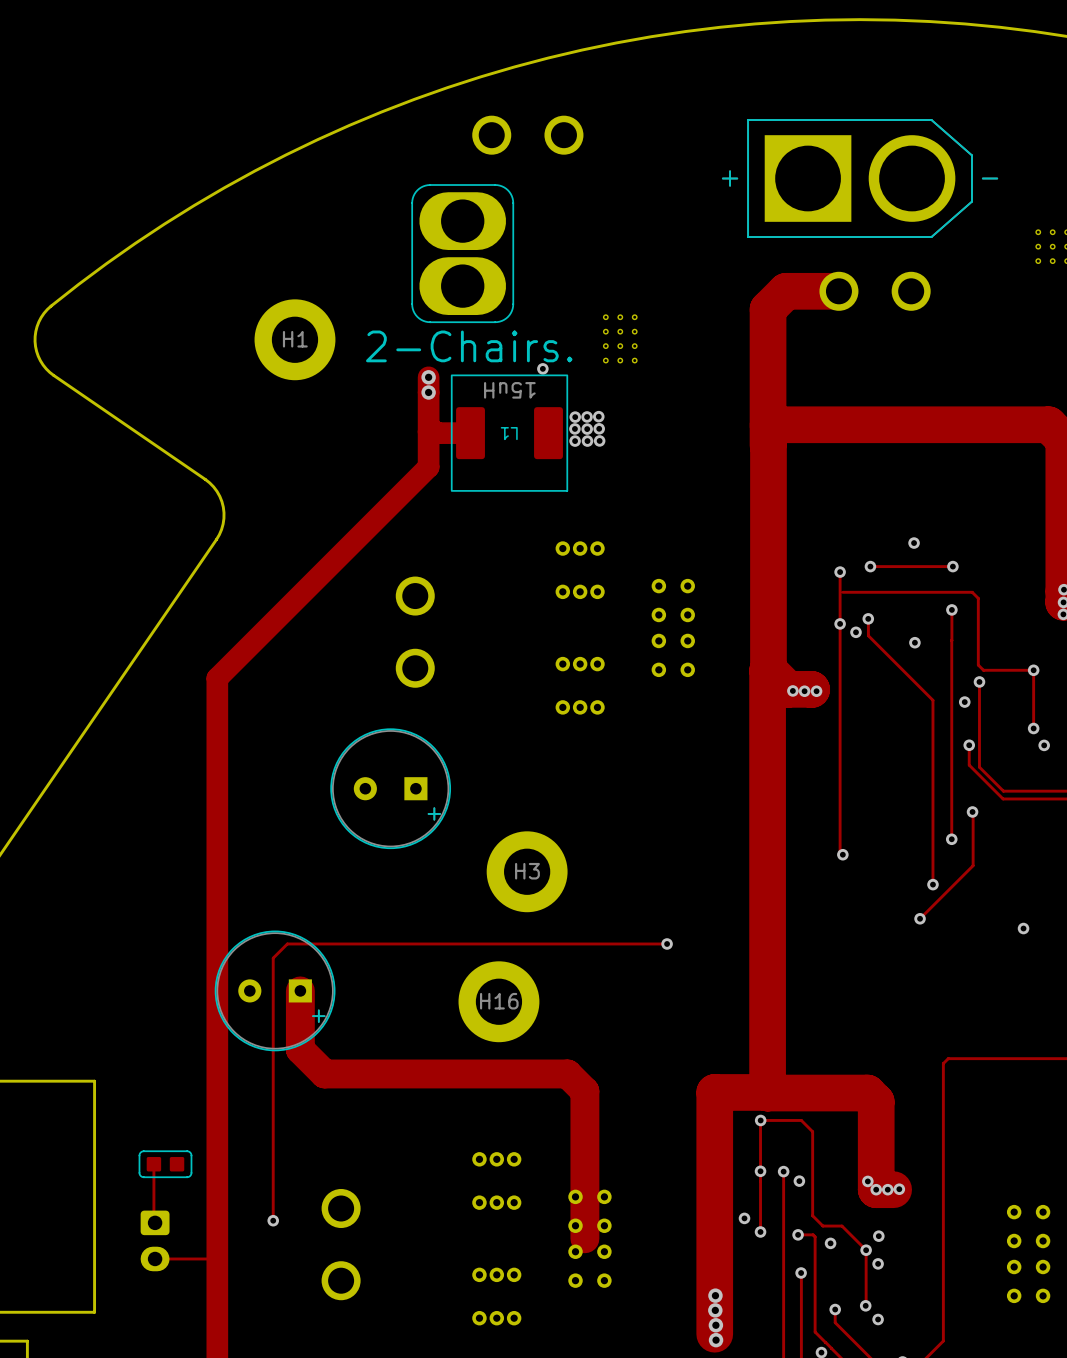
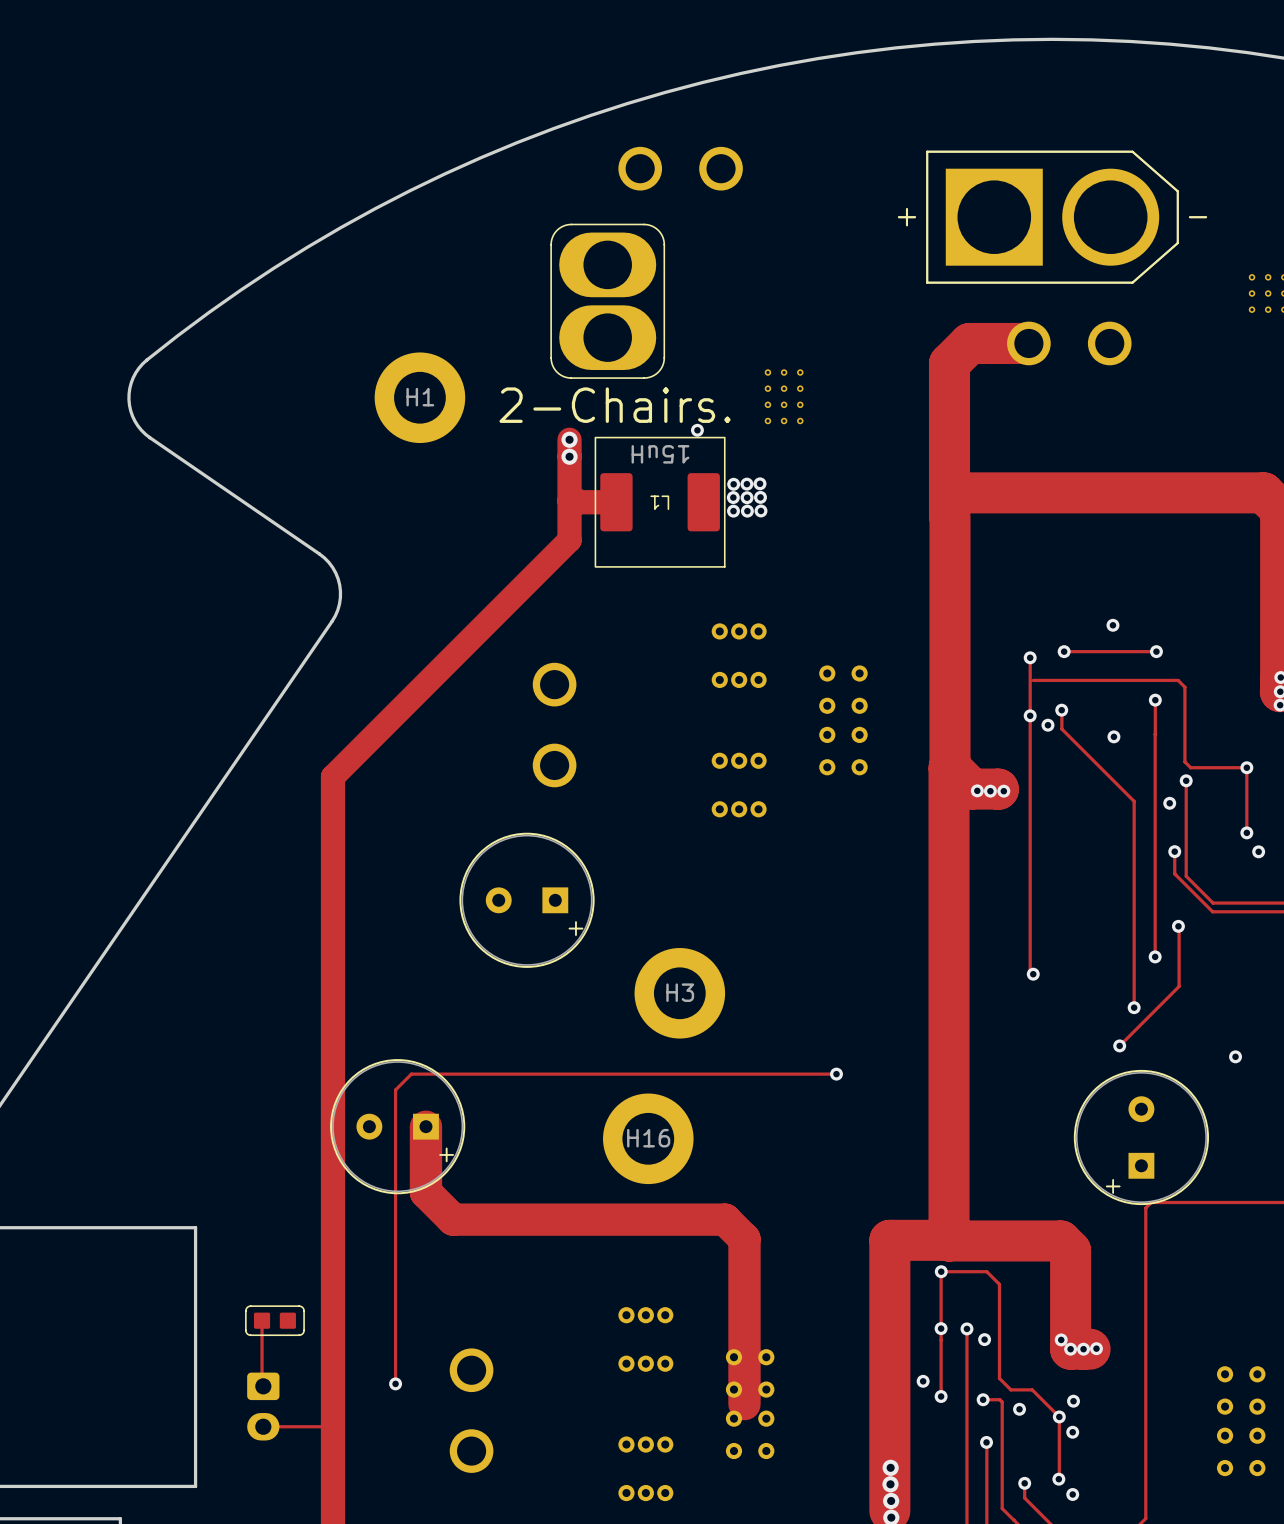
part: none -> (1141, 1137)

